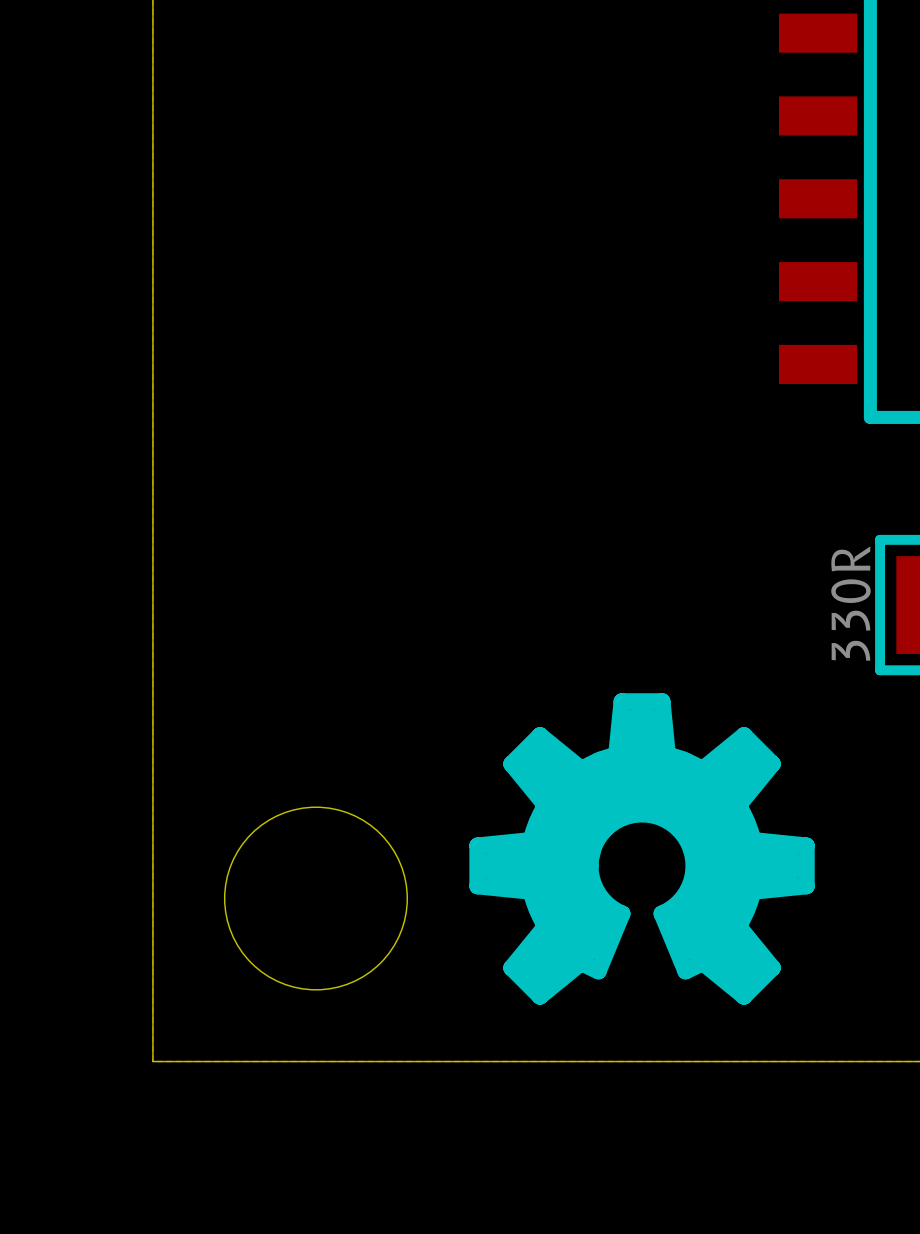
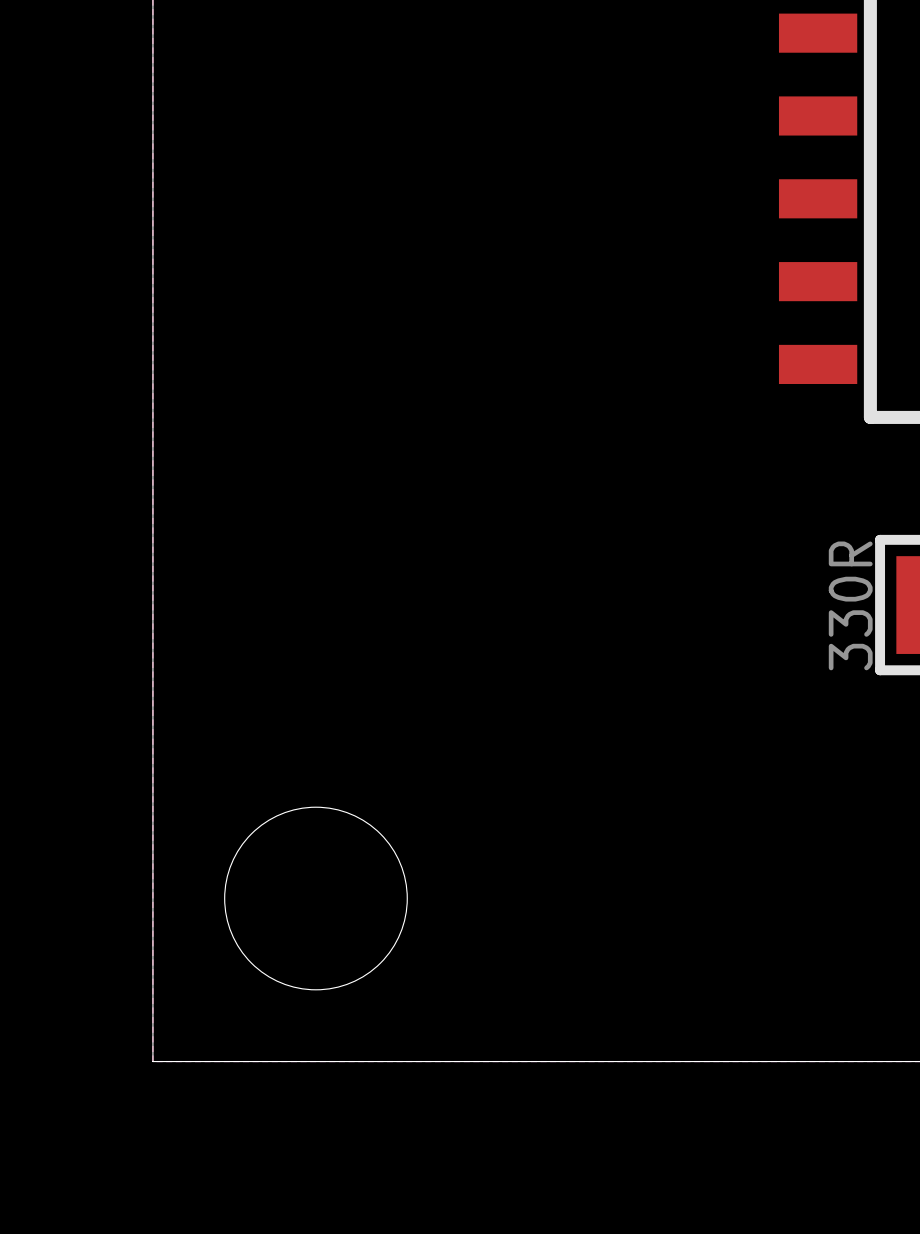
drawing: [469, 693, 815, 1005] -> none

